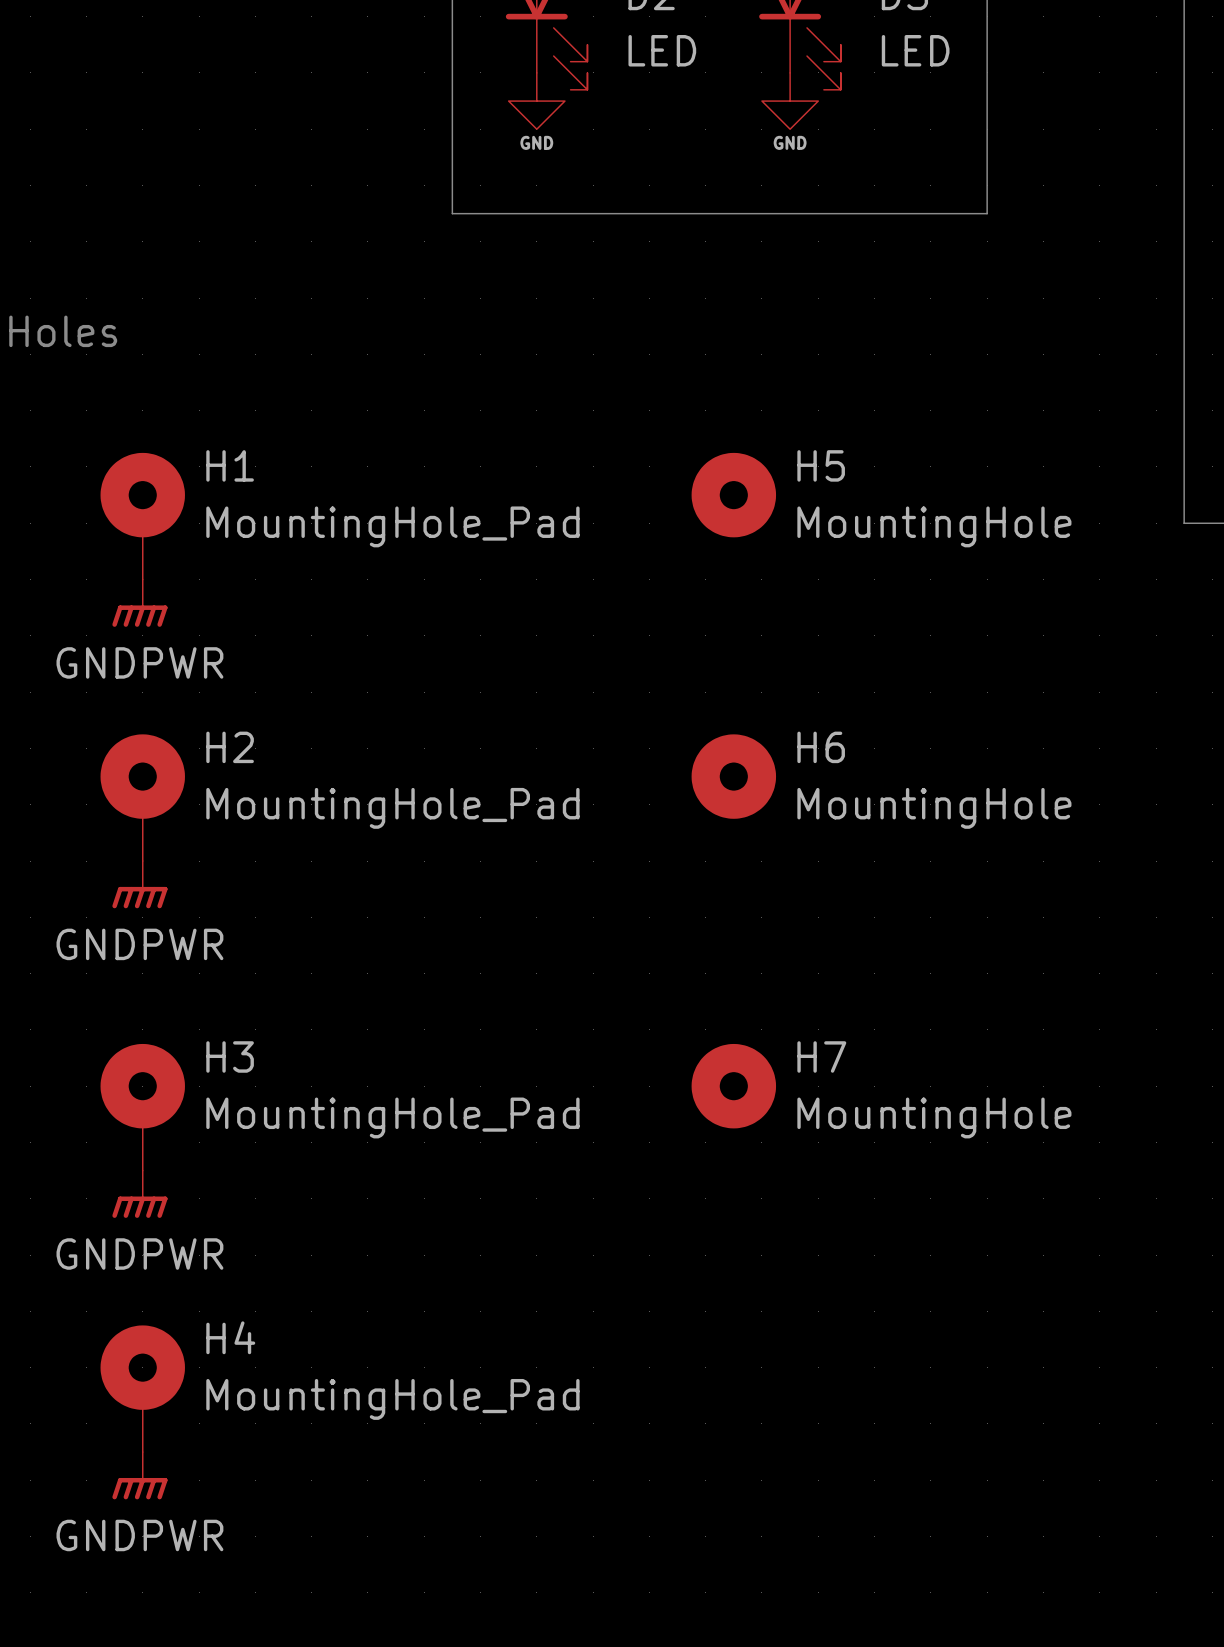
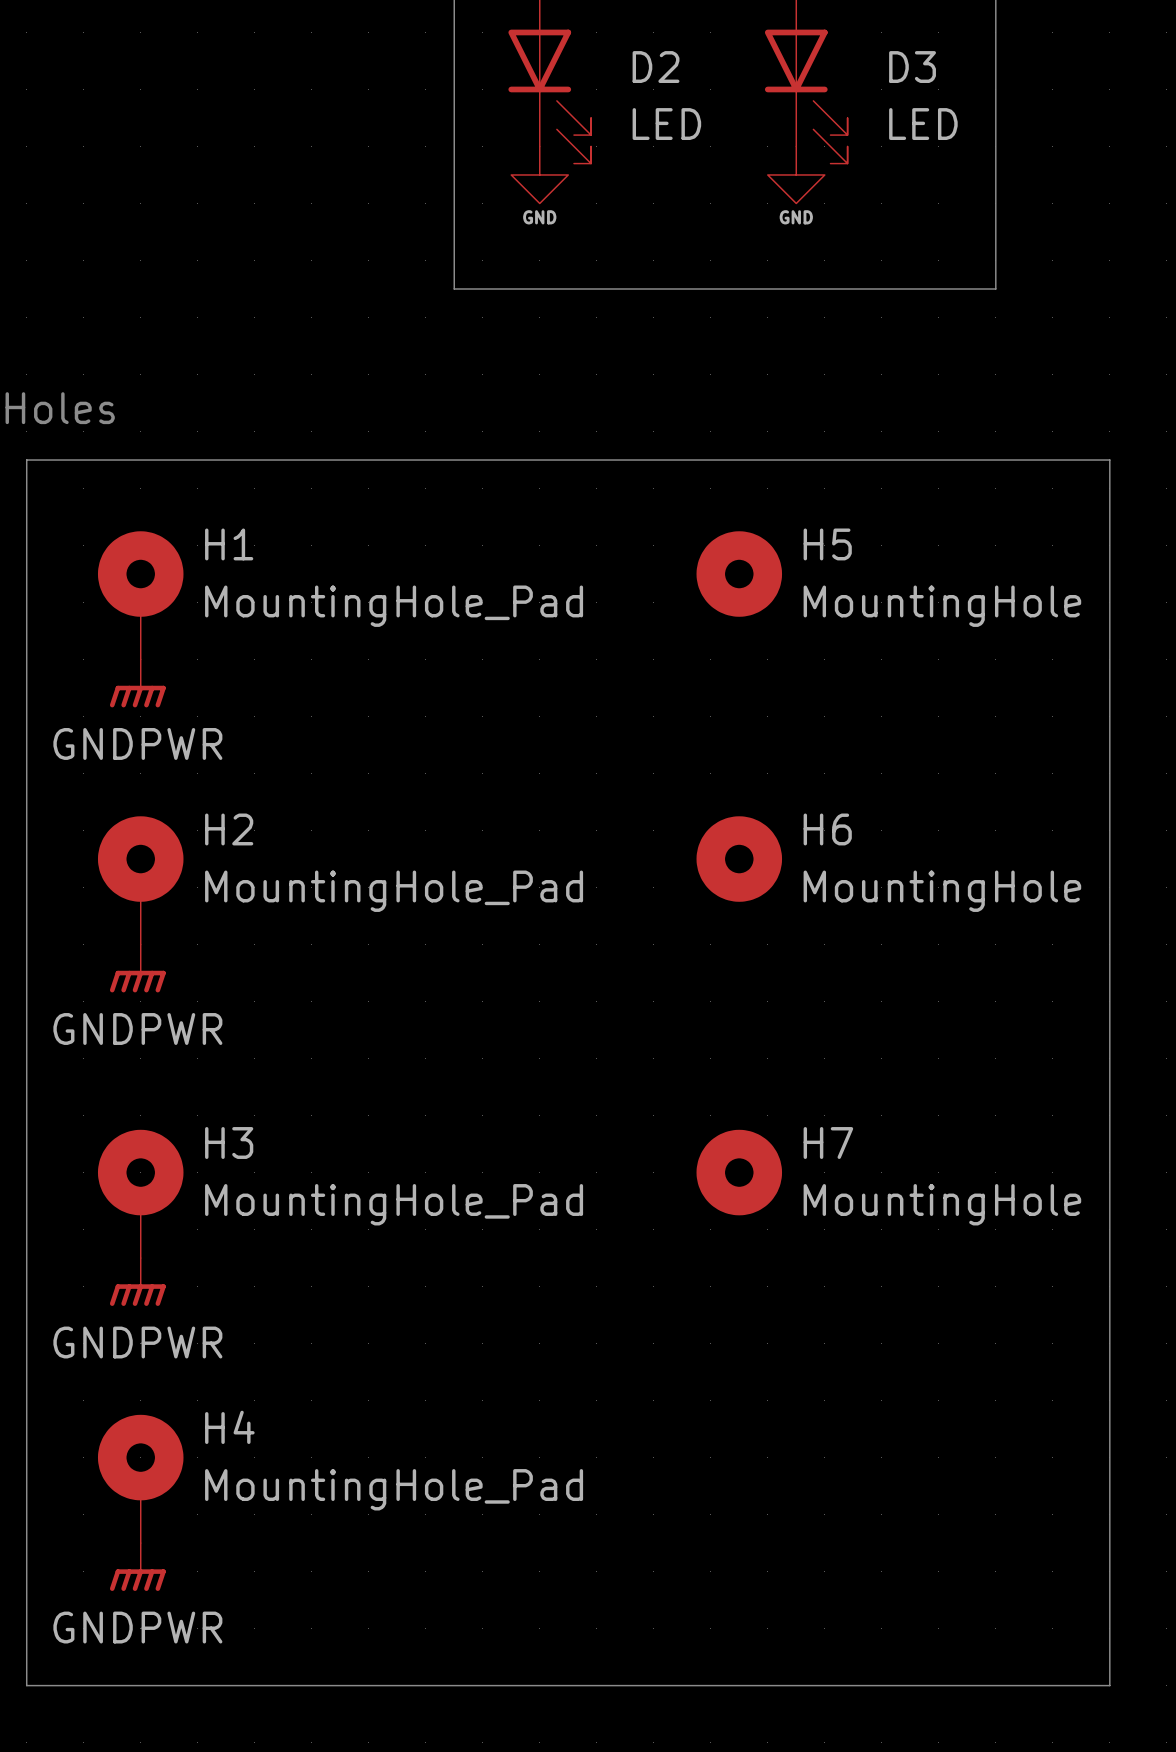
line: none -> (26, 460) (1109, 460) (1109, 1685) (26, 1685) (26, 460)

